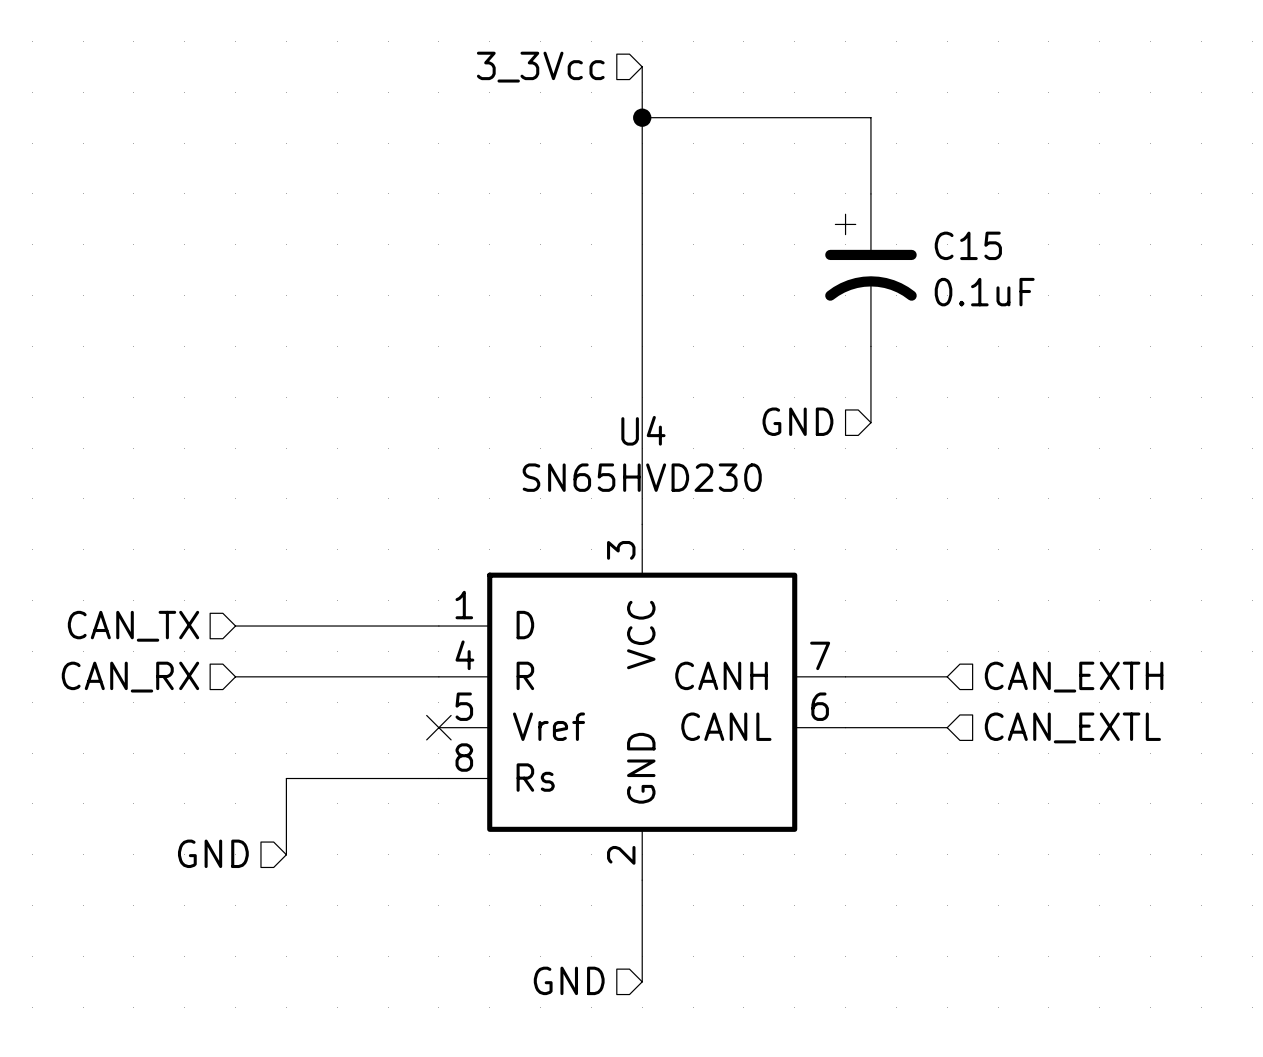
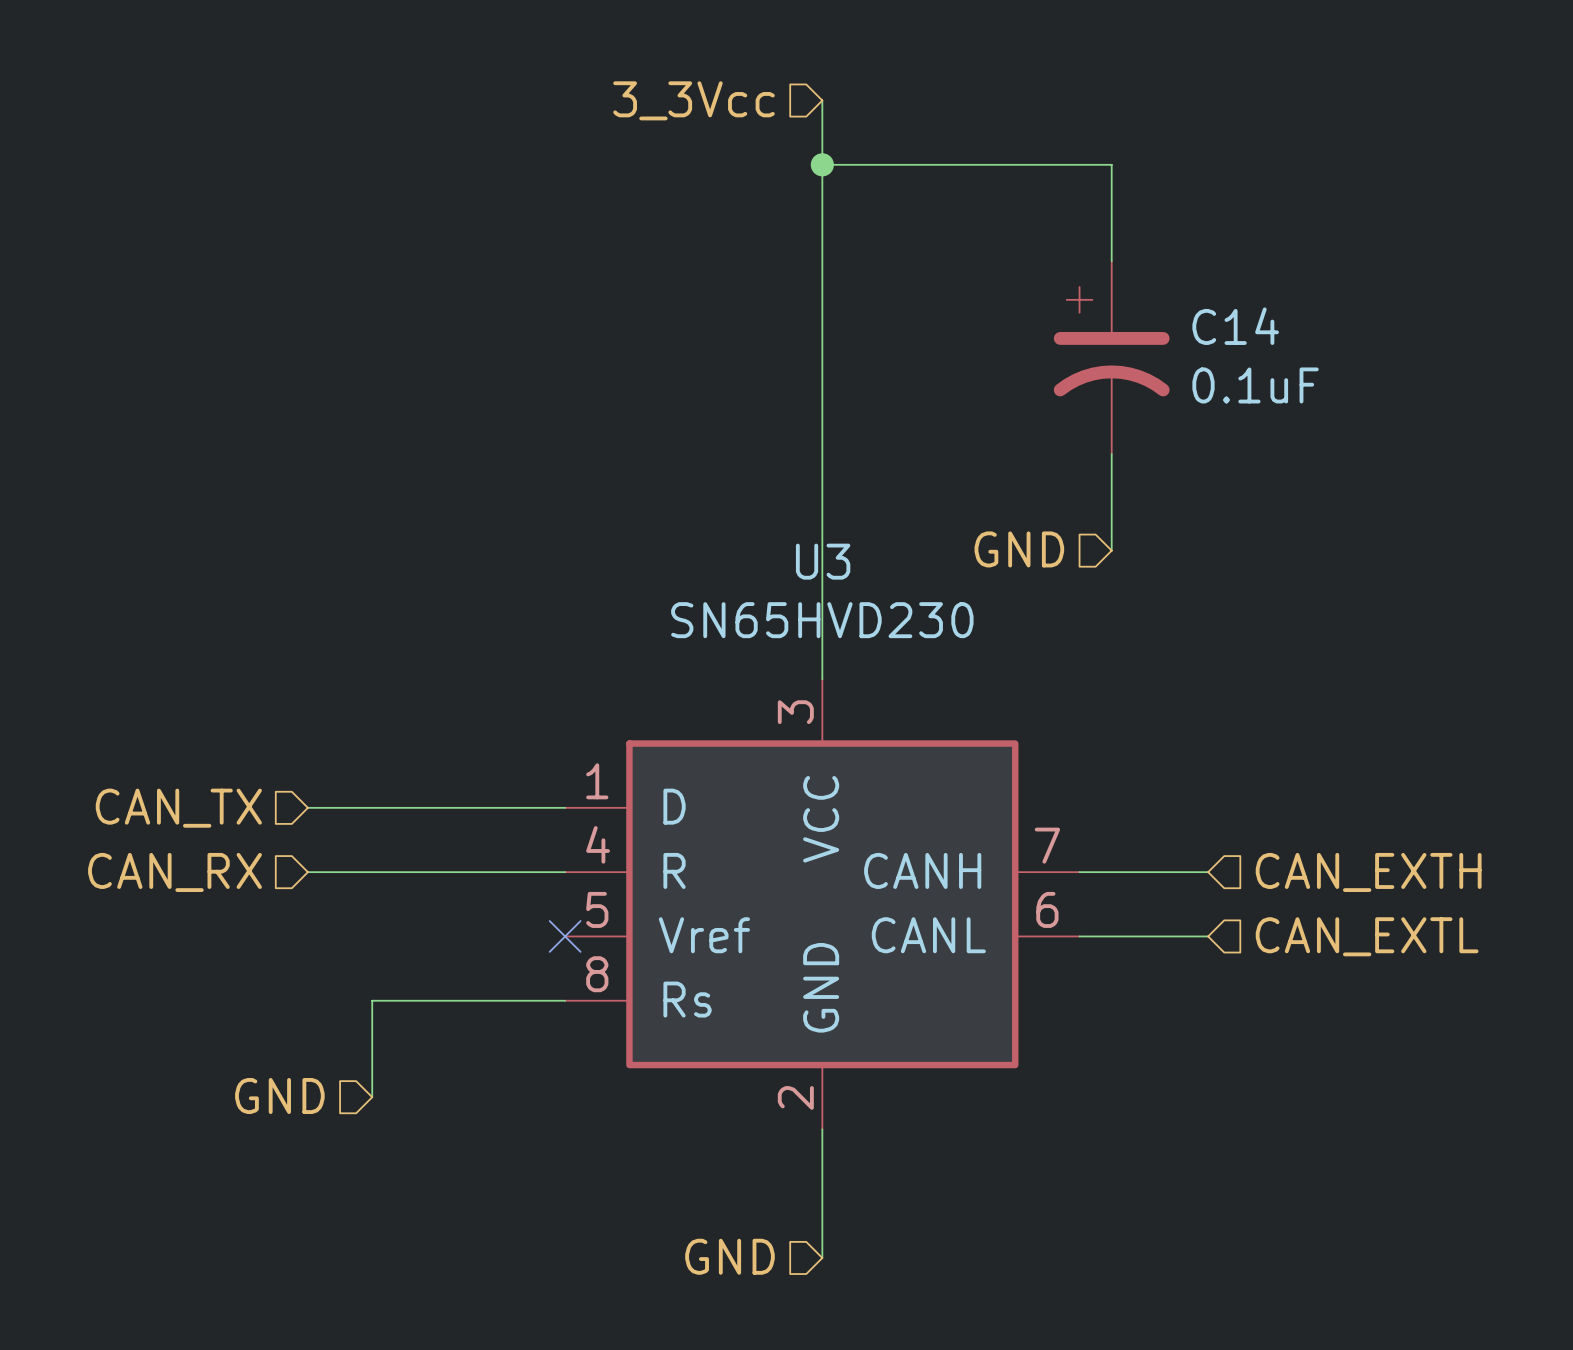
C15 name: C15 (968, 245) -> C14 (1235, 326)
U4 name: U4 (643, 430) -> U3 (823, 561)

